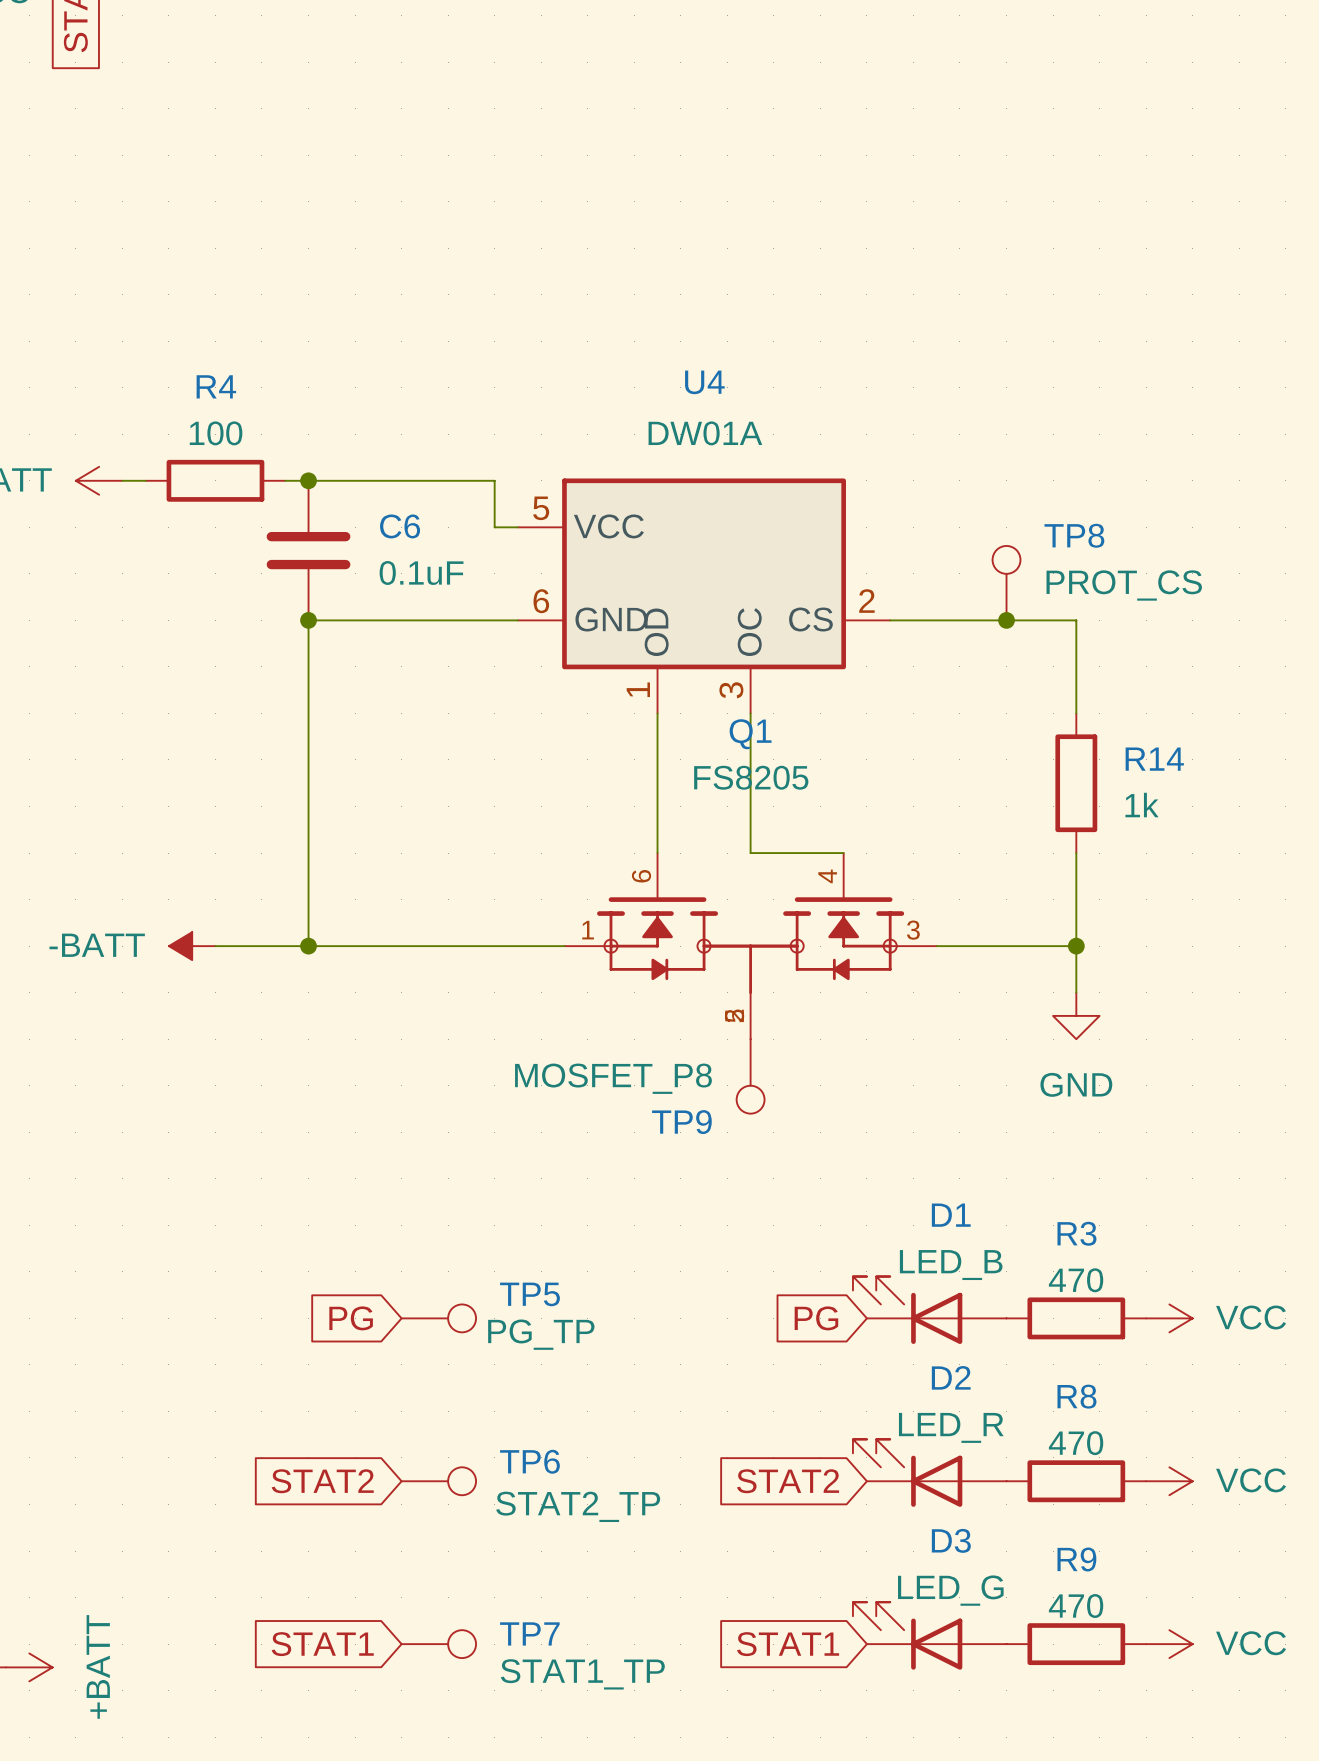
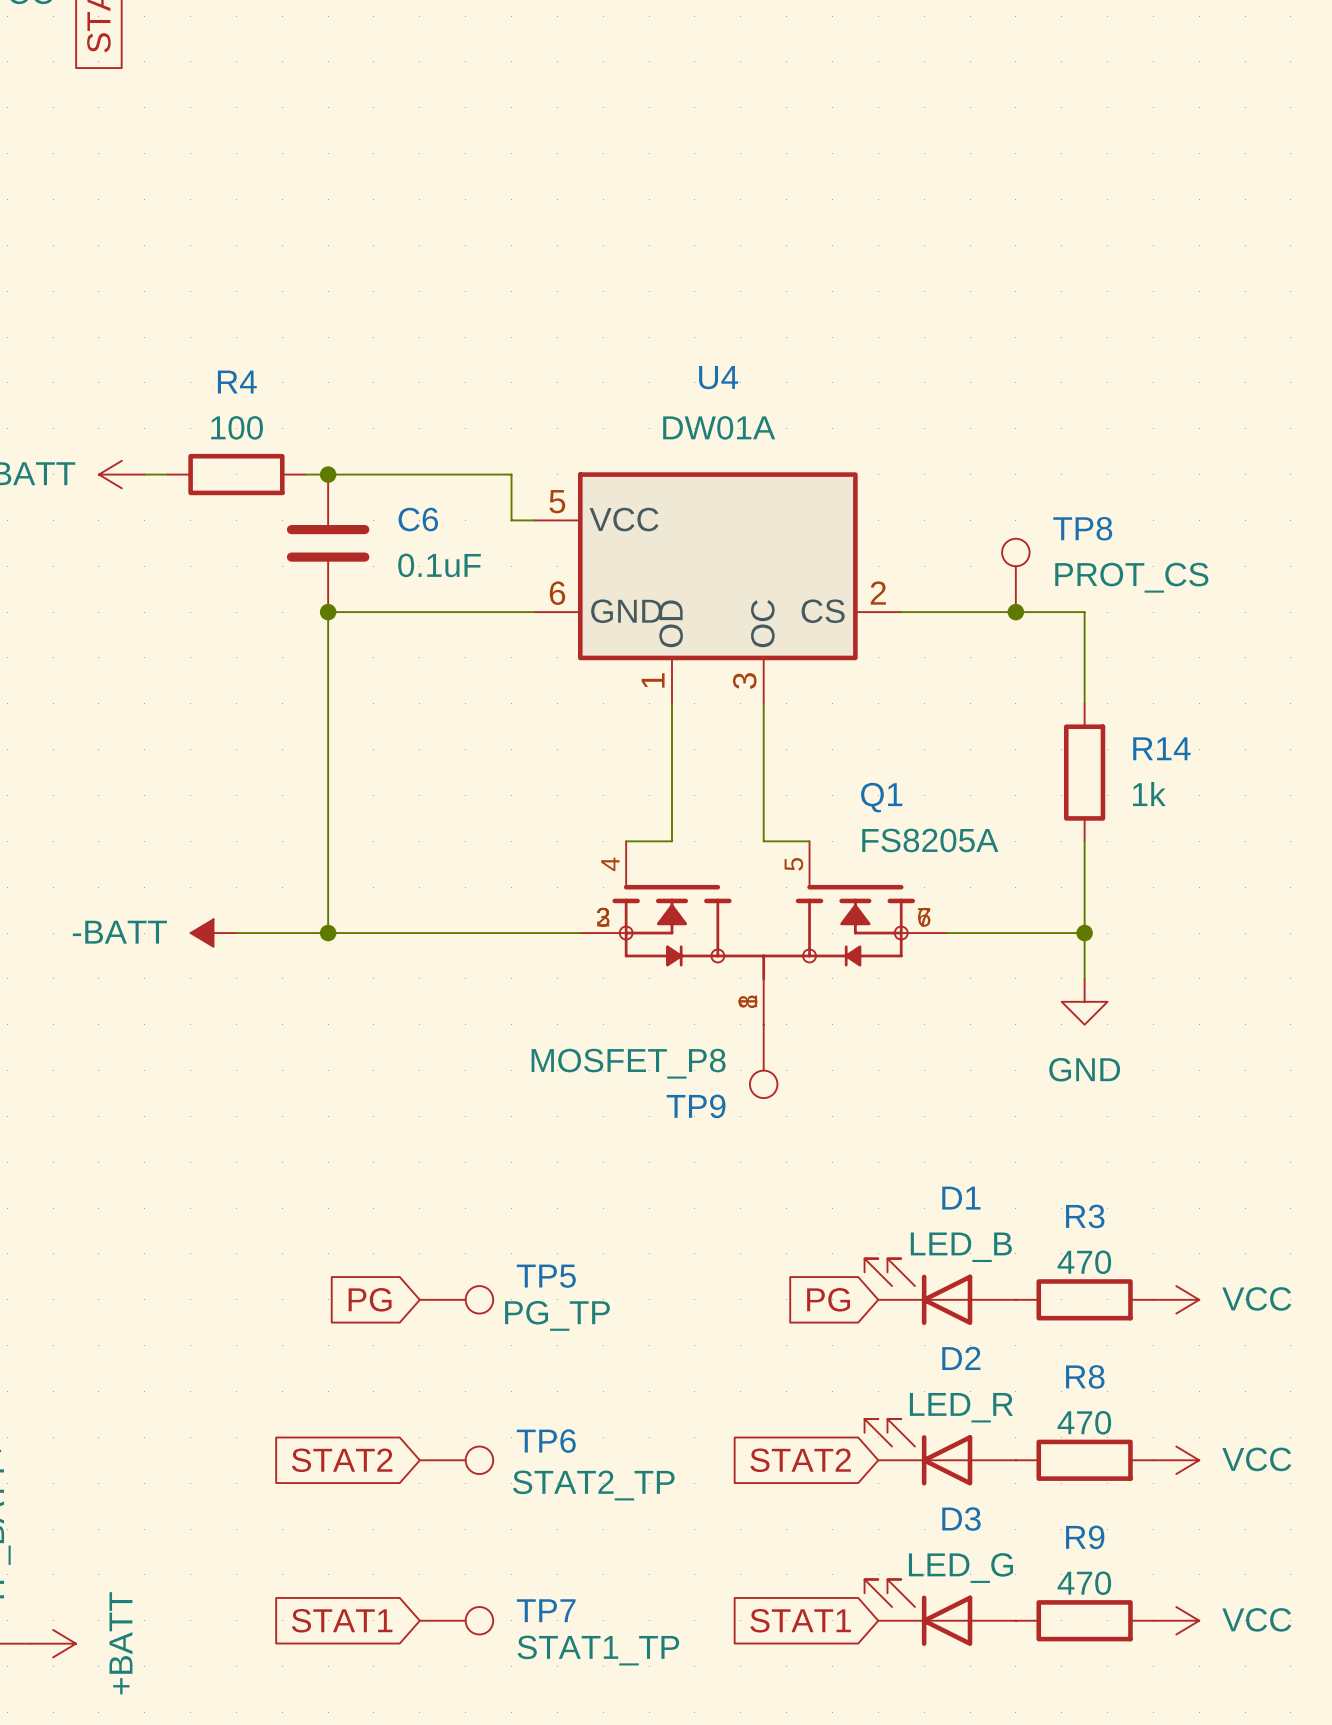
Q1 name position: Q1 (750, 734) -> Q1 (881, 797)
Q1 value: FS8205 (751, 777) -> FS8205A (930, 840)
Q1 symbol: [564, 853, 937, 1040] -> [580, 841, 948, 1025]
wire: (797, 853) (843, 853) -> (626, 841) (671, 841)

